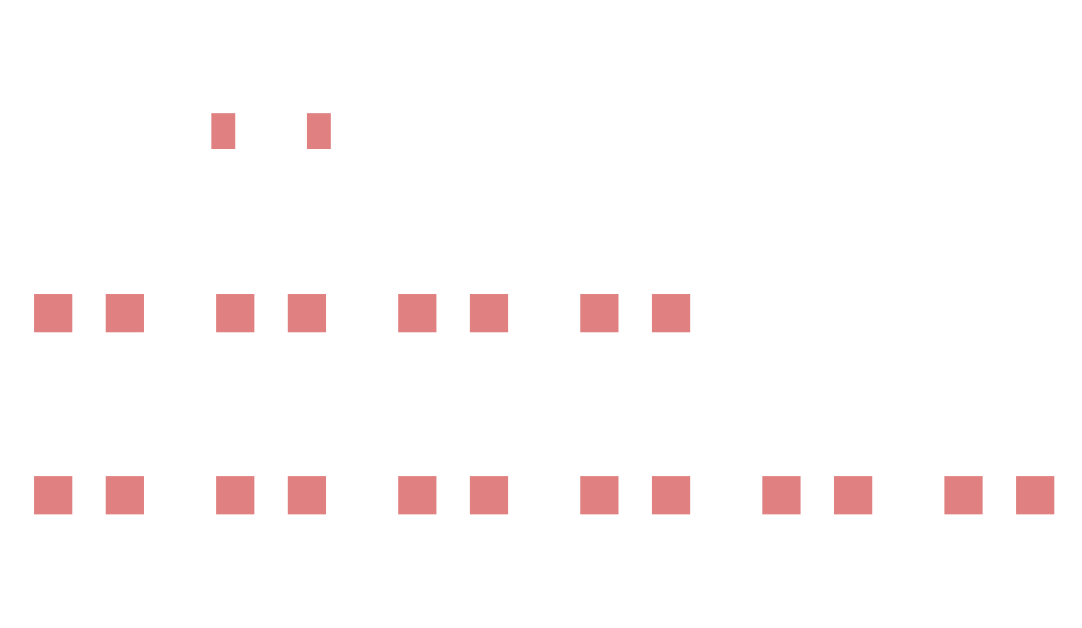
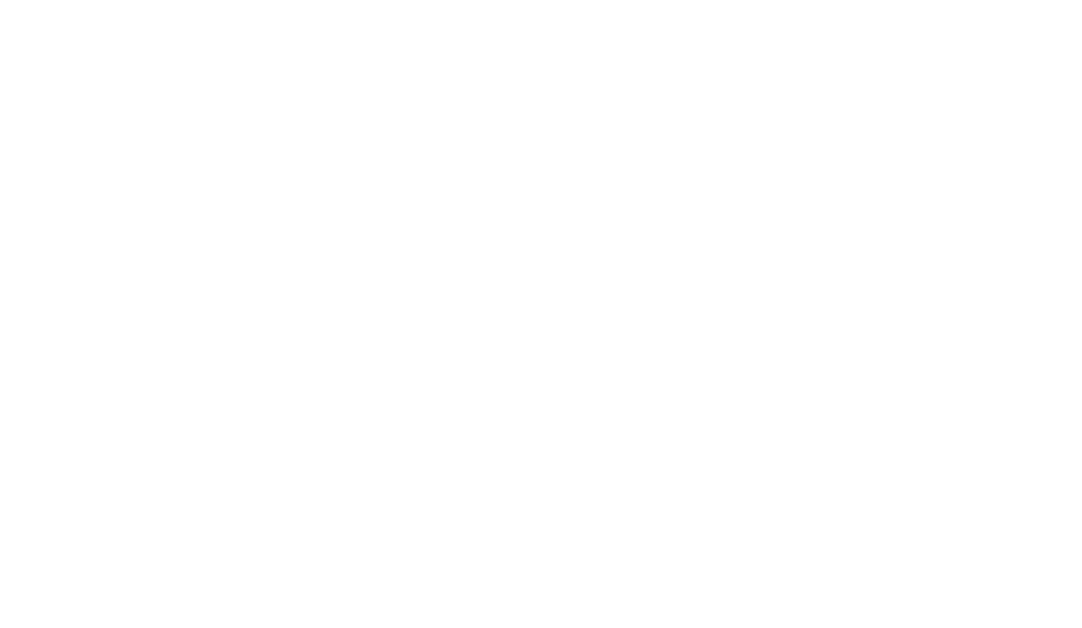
part: (271, 131) -> none
part: (89, 313) -> none
part: (271, 313) -> none
part: (453, 313) -> none
part: (635, 313) -> none
part: (89, 495) -> none
part: (271, 495) -> none
part: (453, 495) -> none
part: (635, 495) -> none
part: (817, 495) -> none
part: (999, 495) -> none

